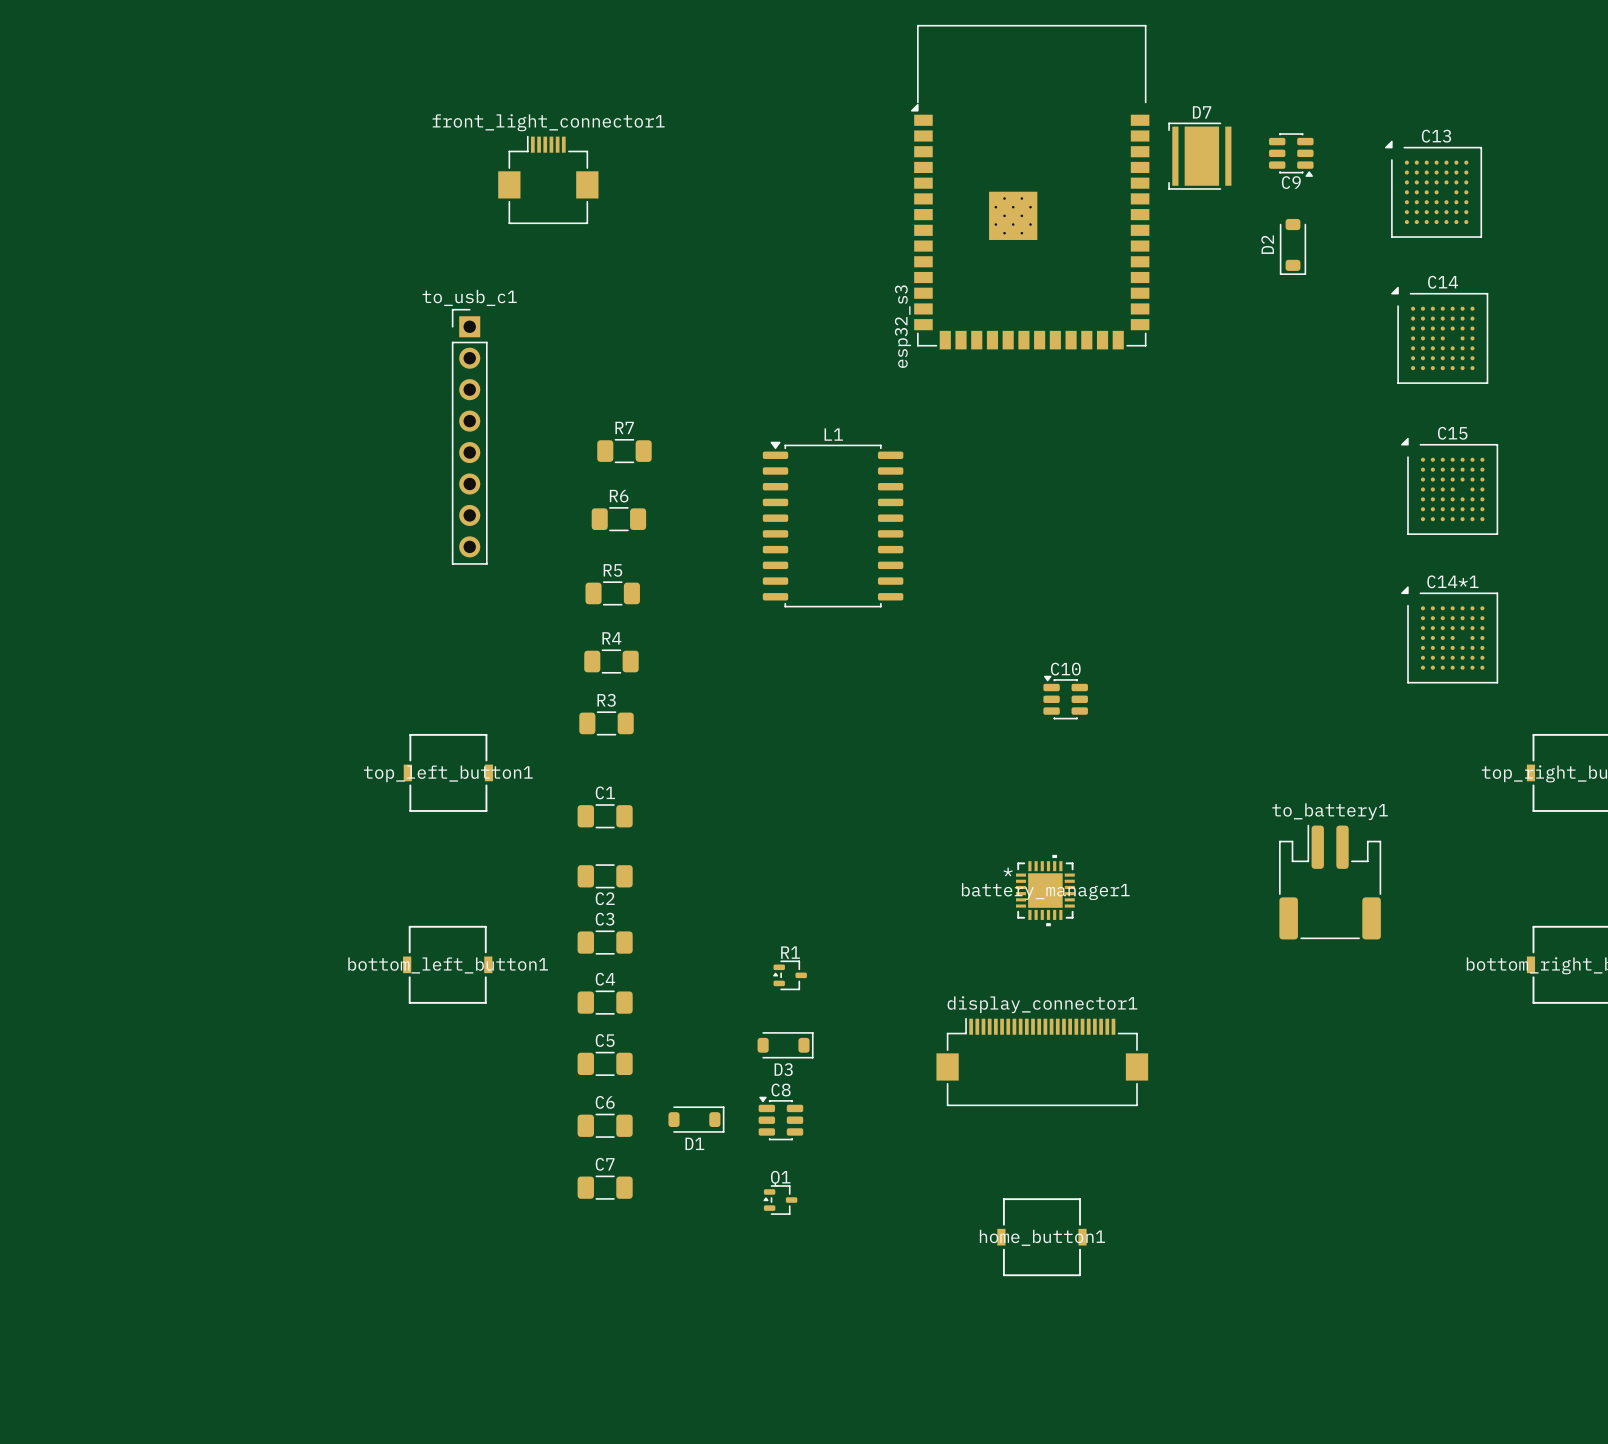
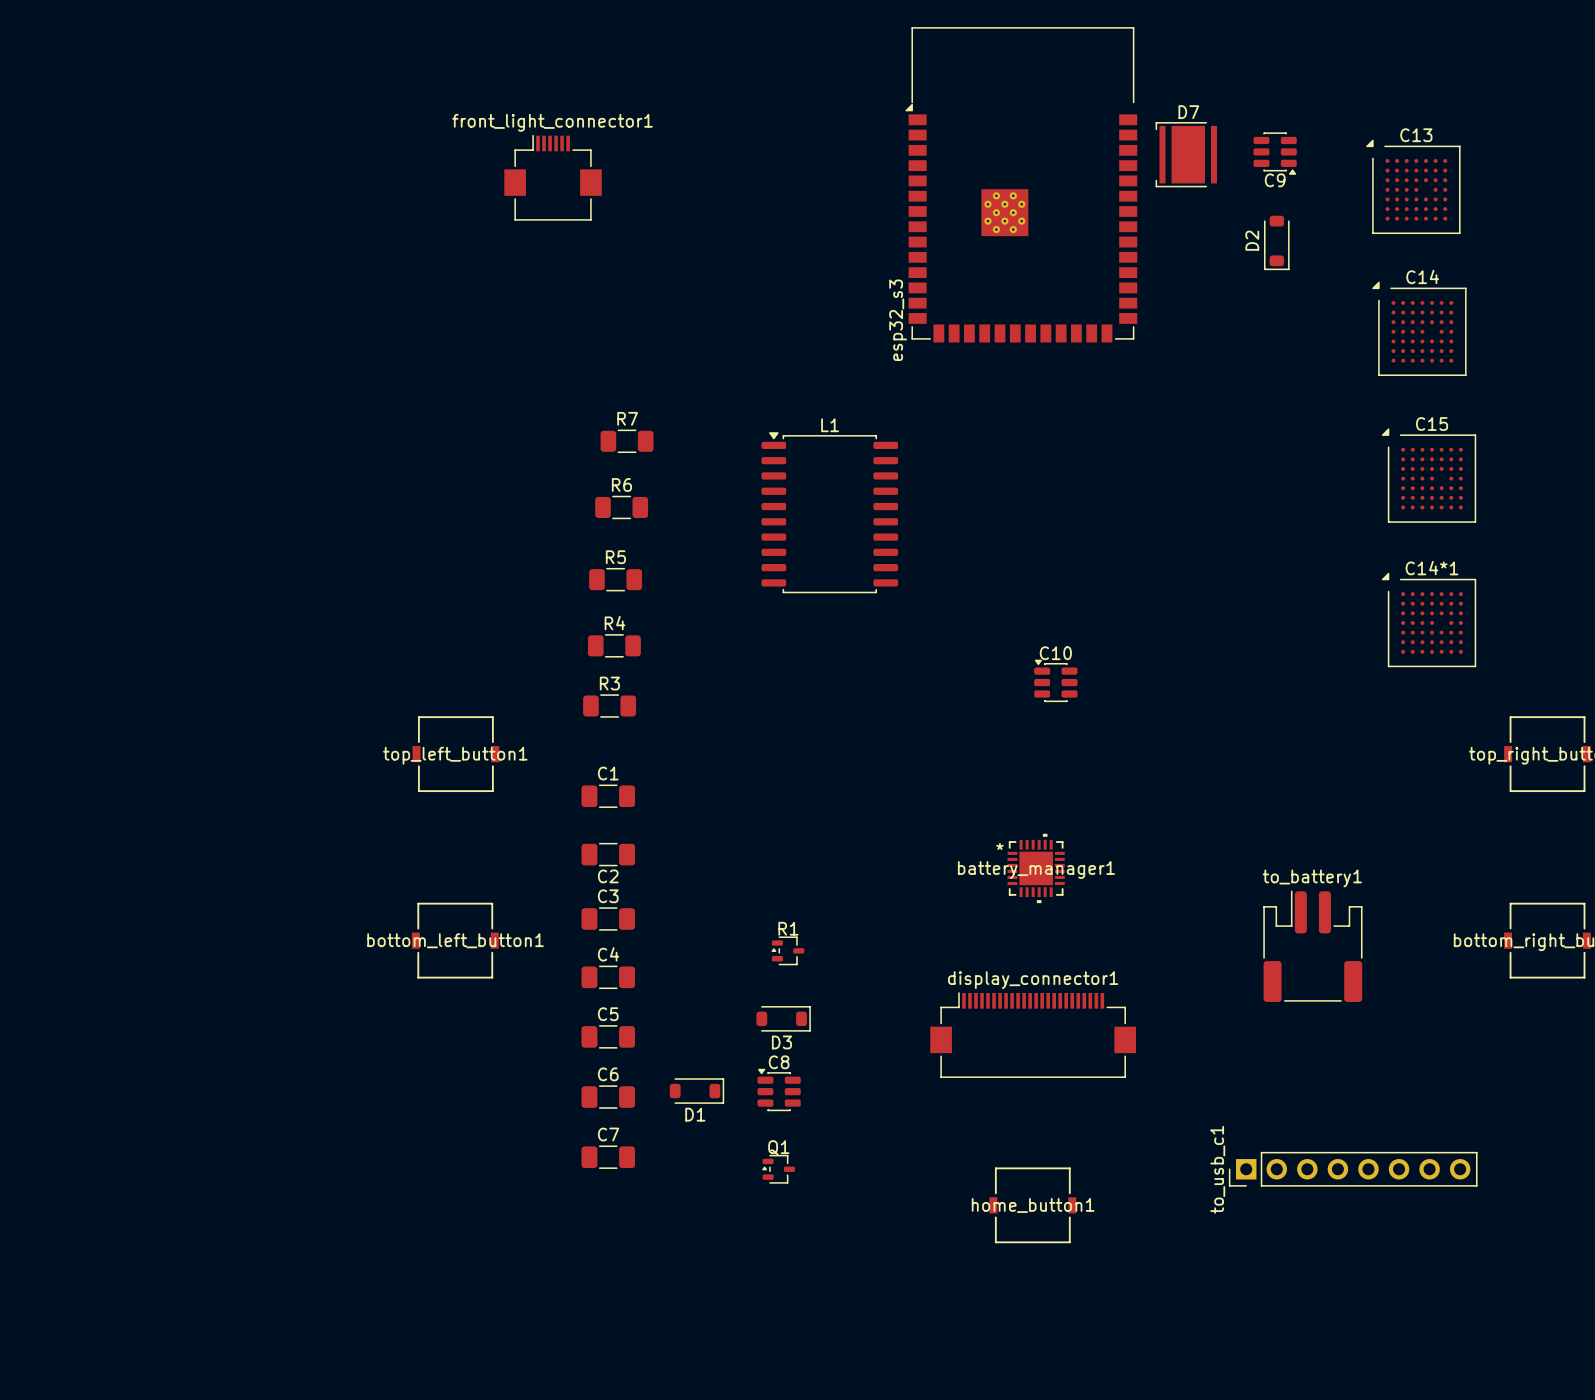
to_usb_c1 rotation: 0° (469, 436) -> 90° counterclockwise (1353, 1169)
to_usb_c1 position: (469, 436) -> (1353, 1169)
to_battery1 position: (1330, 882) -> (1312, 946)

